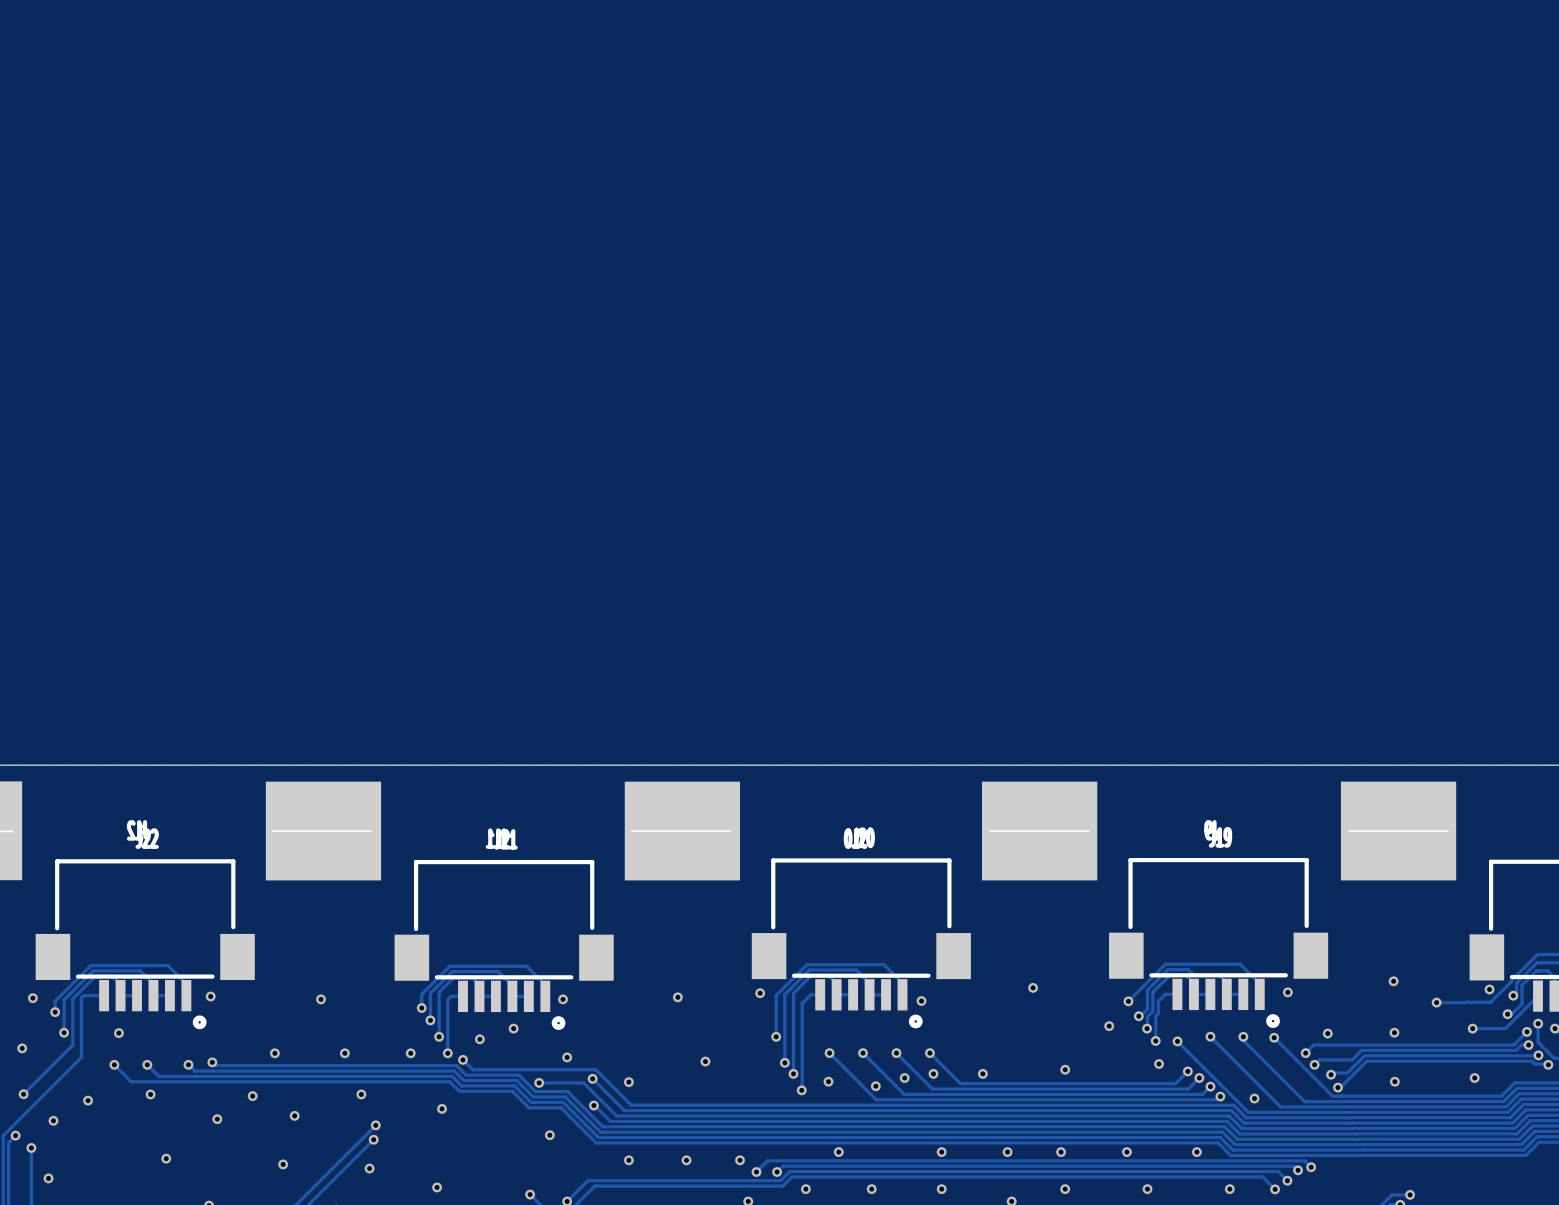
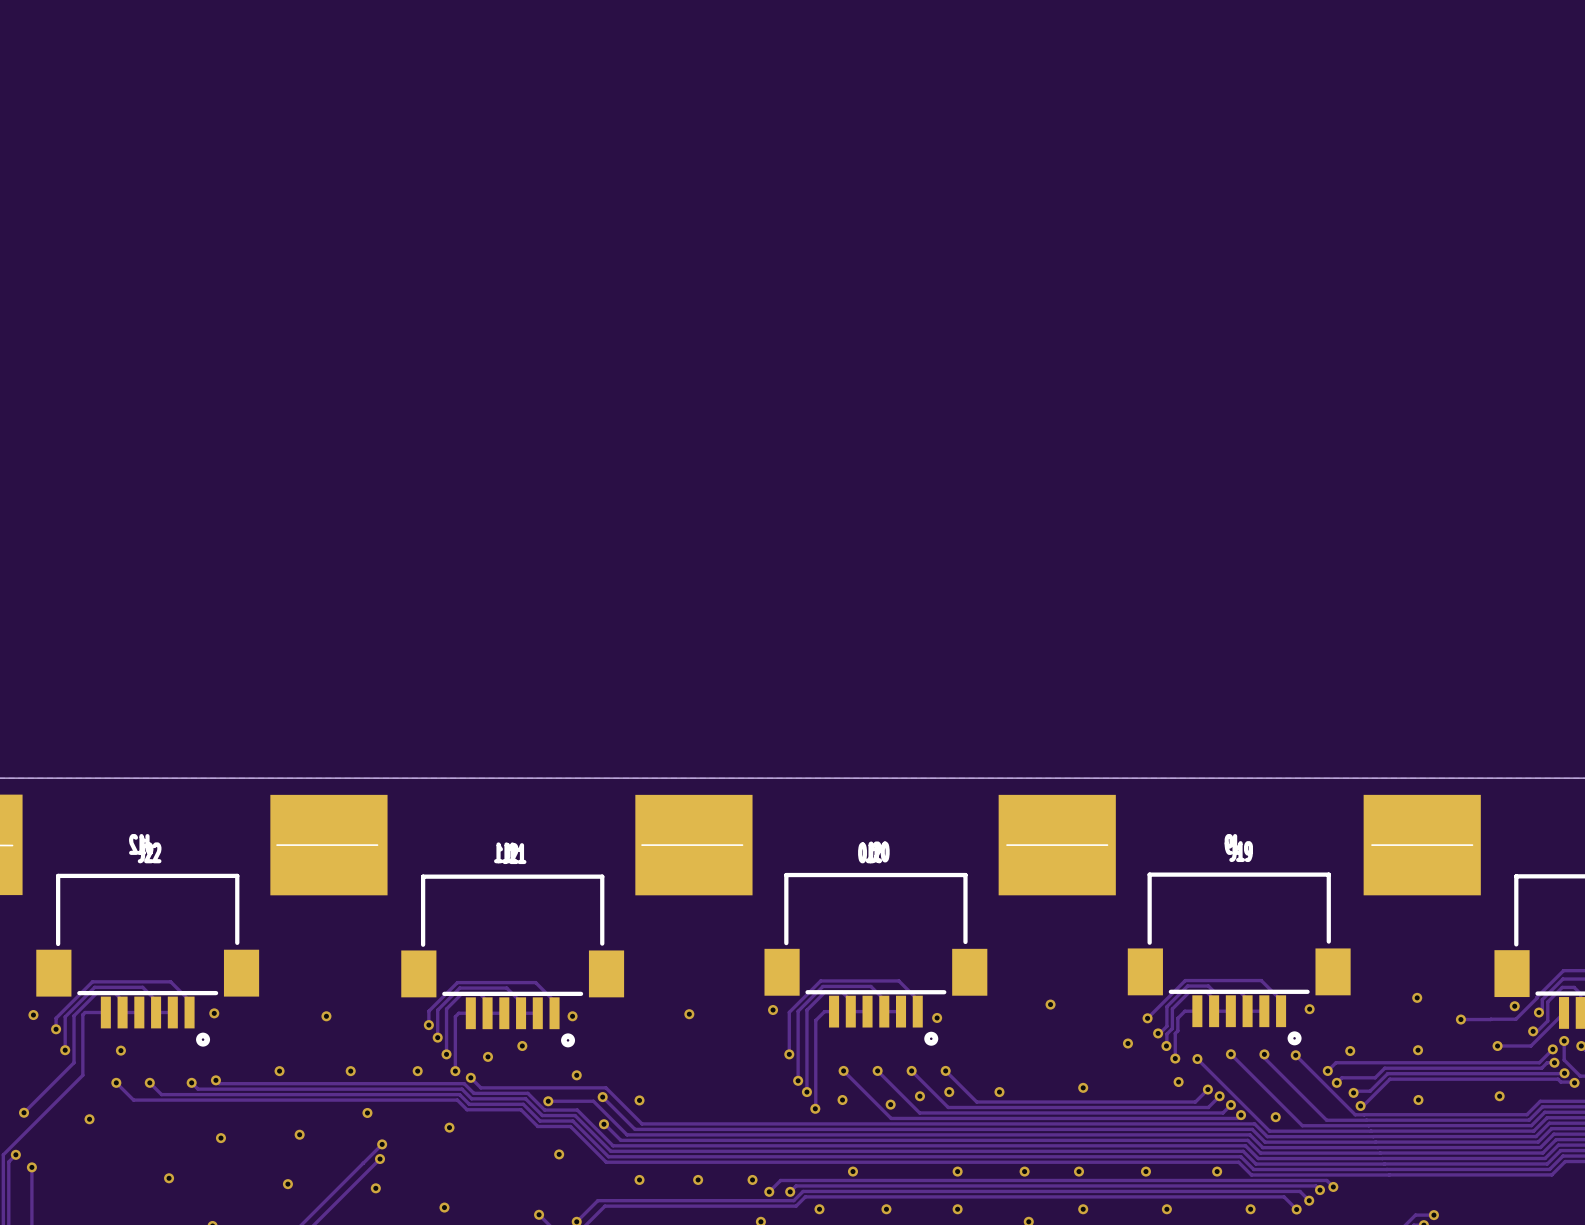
via: (22, 1048) -> none
via: (705, 1061) -> none
via: (150, 1094) -> none
via: (252, 1096) -> none
via: (53, 1120) -> none
via: (48, 1178) -> none

